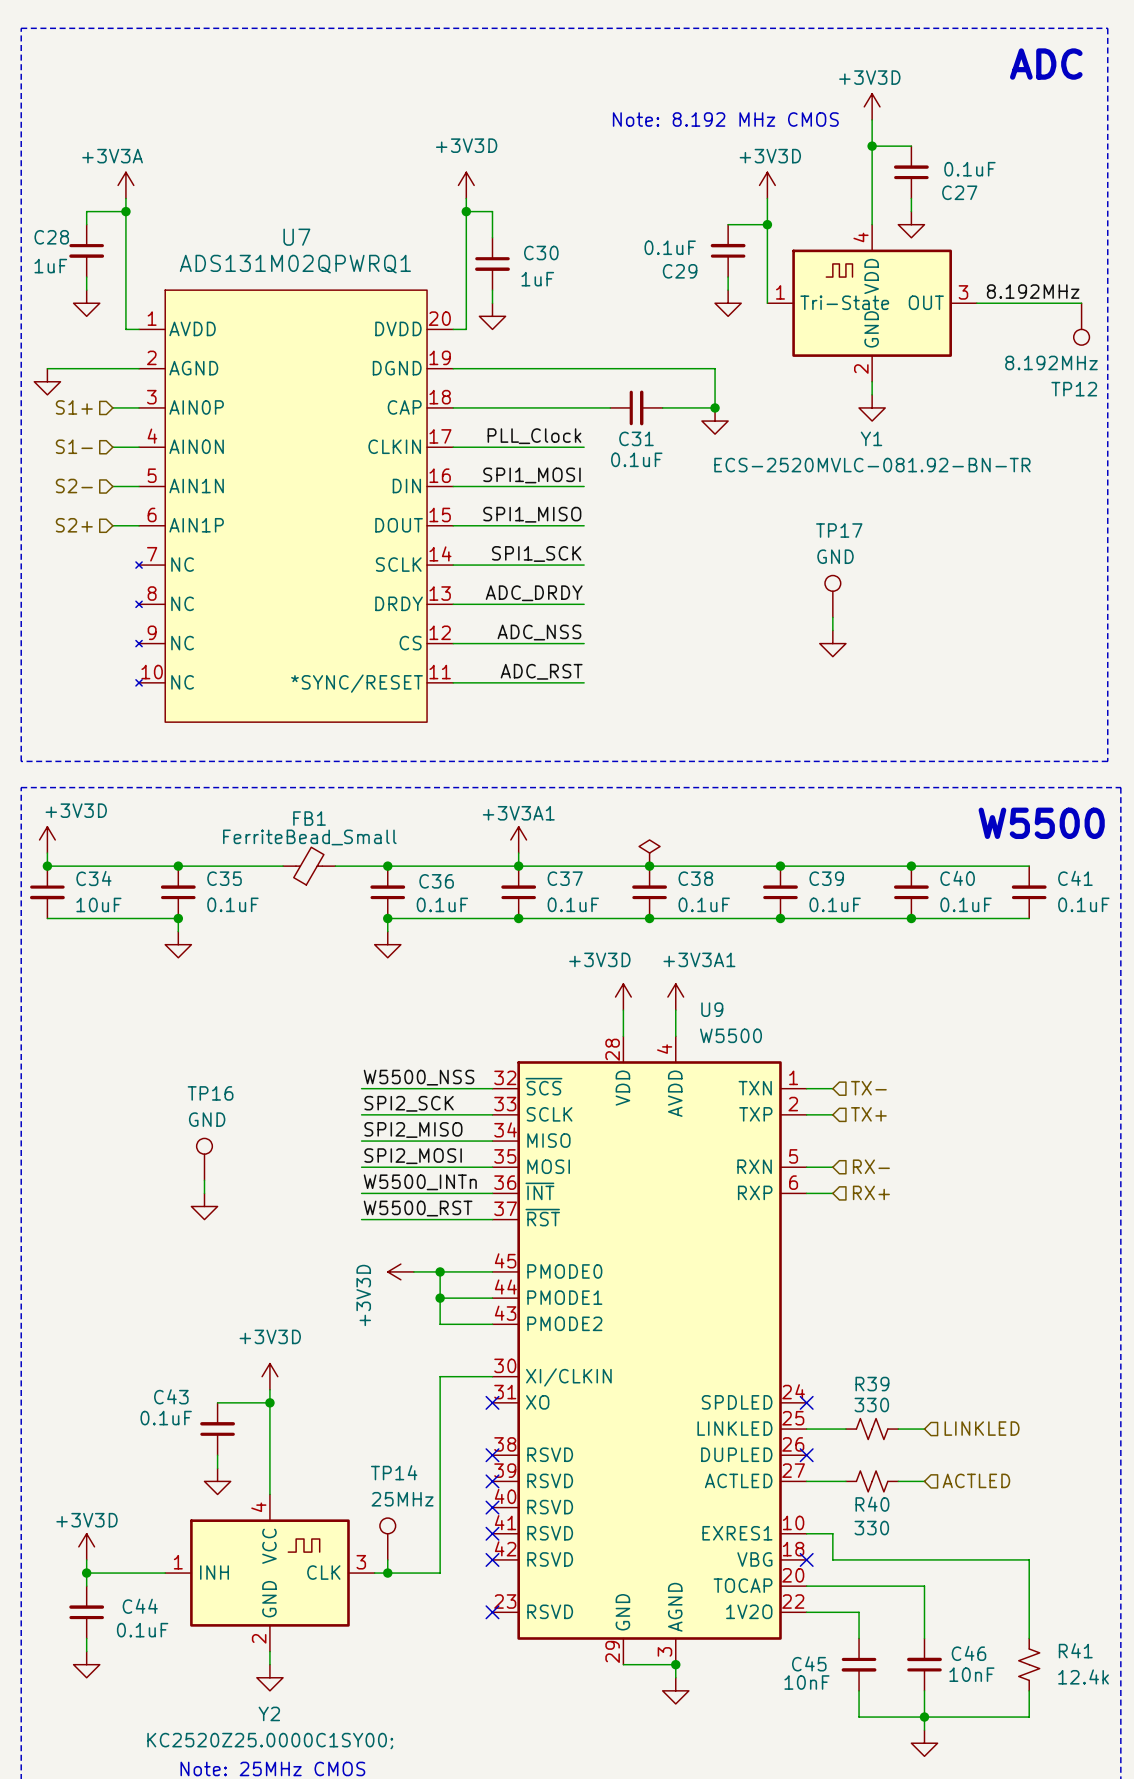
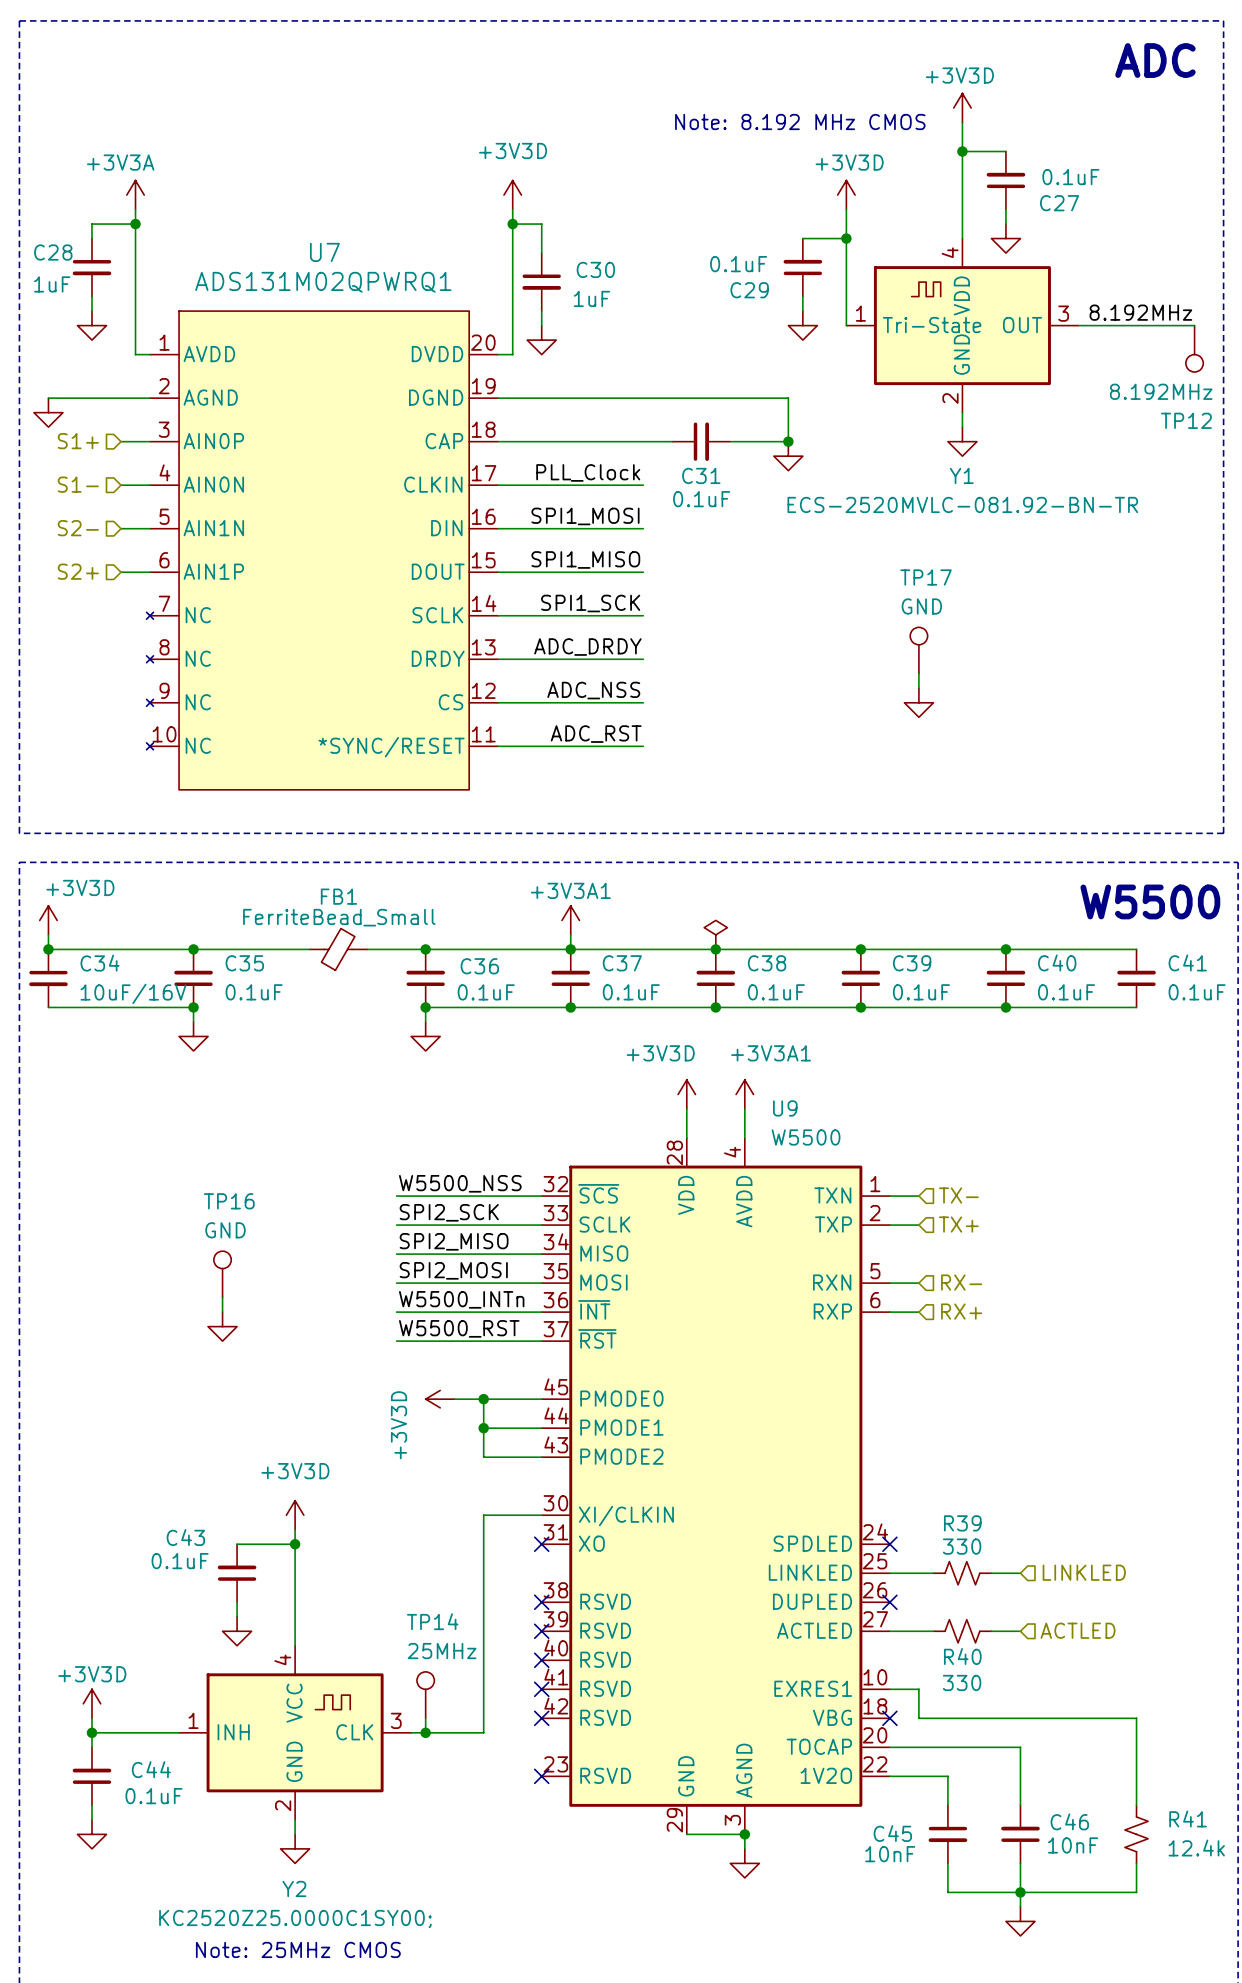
C34 value: 10uF (98, 904) -> 10uF/16V (133, 993)

